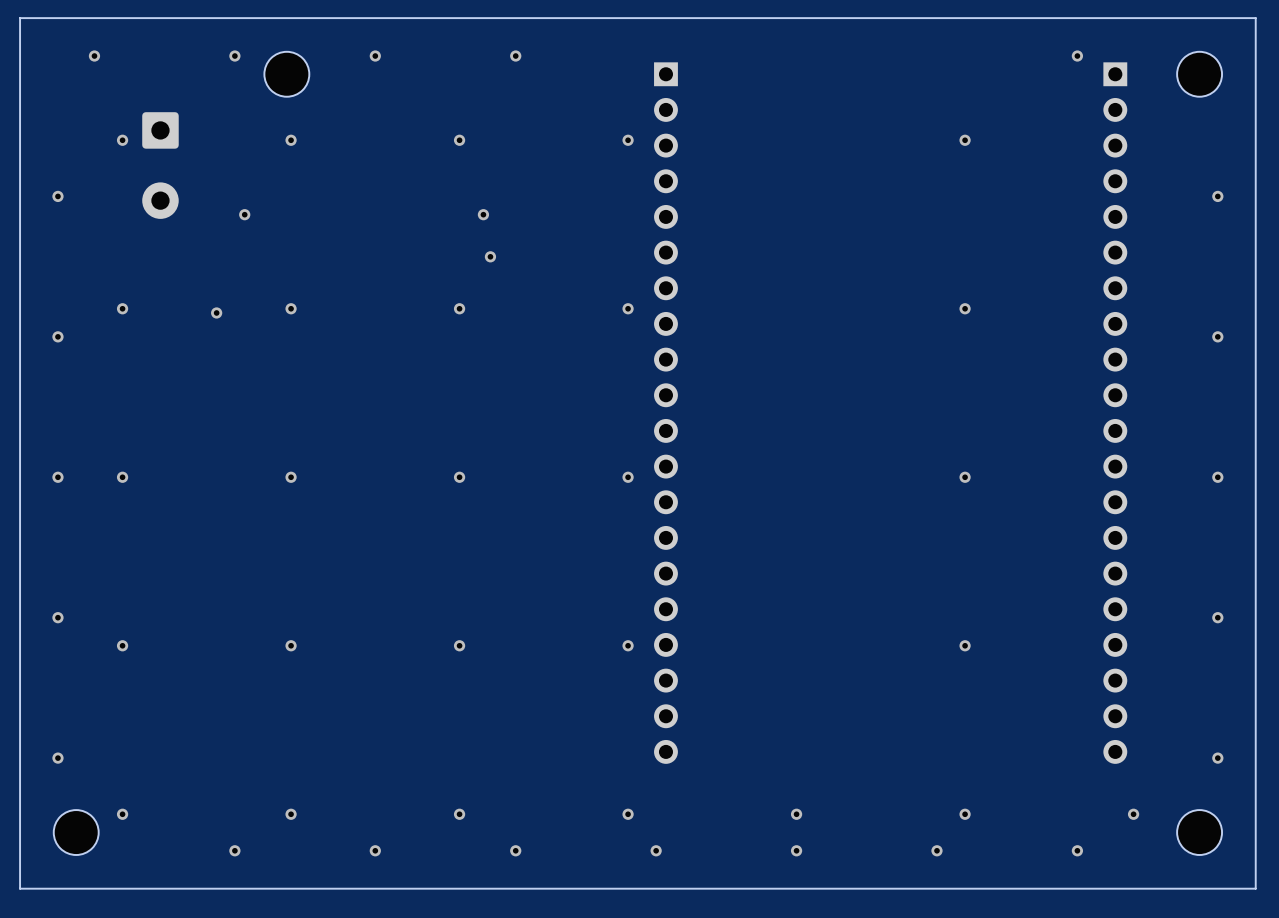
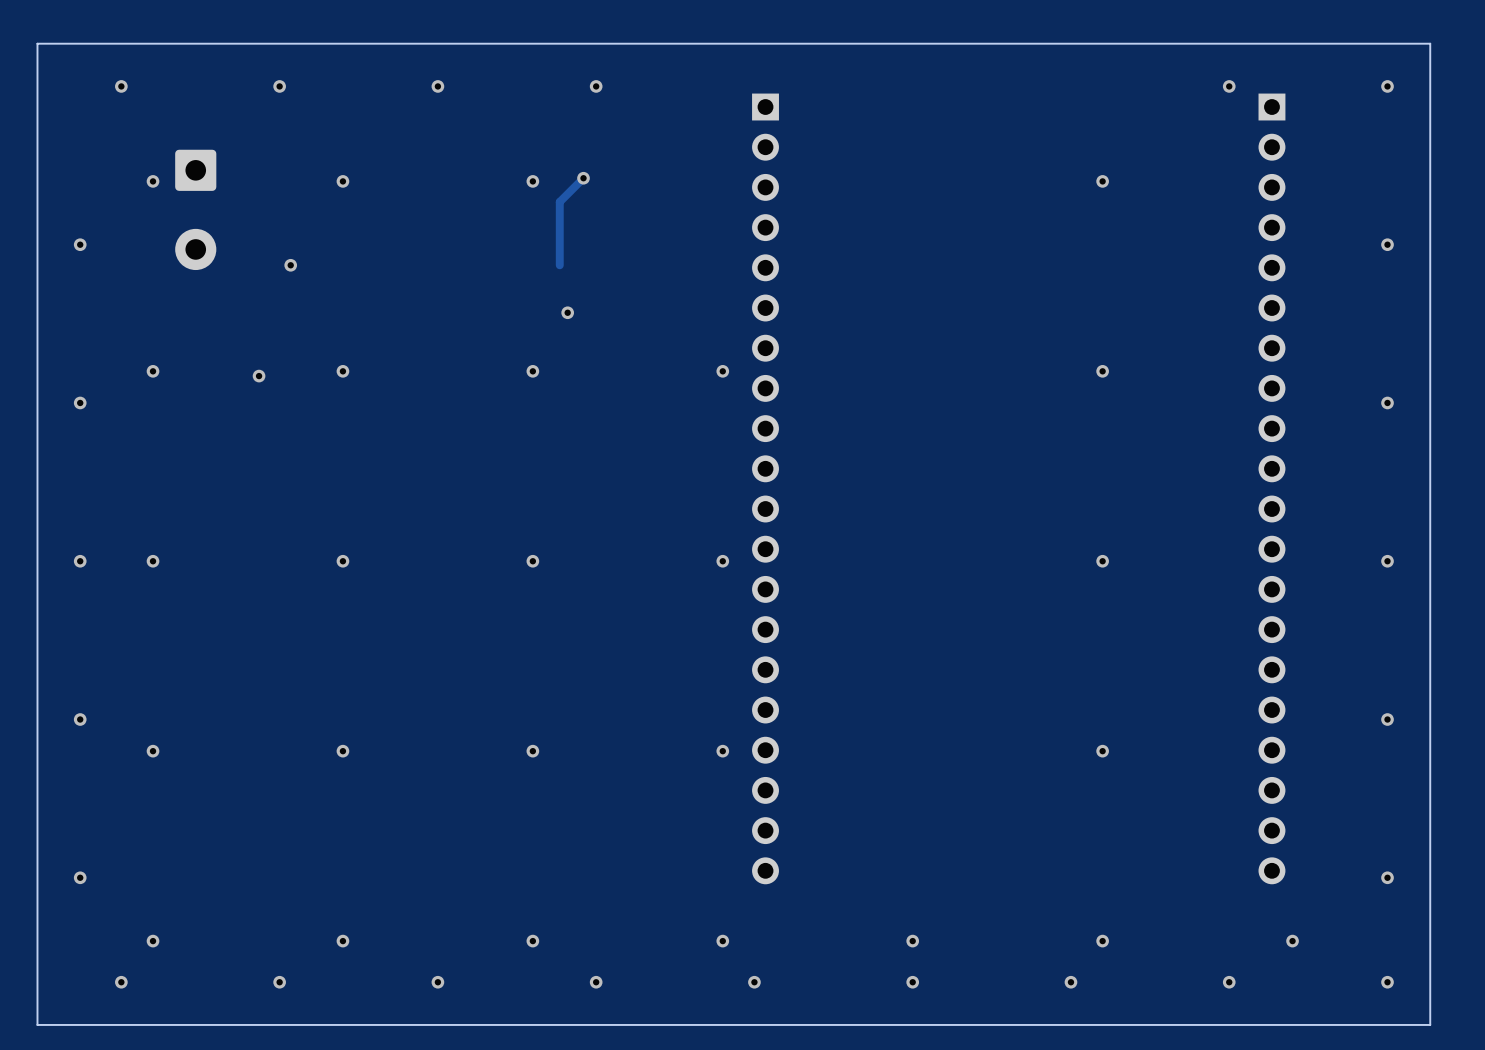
via: none -> (1387, 86)
part: (286, 74) -> none
part: (1199, 74) -> none
track: none -> (583, 178) (559, 201) (559, 265)
via: none -> (583, 178)
via: (628, 140) -> none
via: (483, 214) -> none
part: (76, 832) -> none
part: (1199, 832) -> none
via: none -> (121, 982)
via: none -> (1387, 982)

